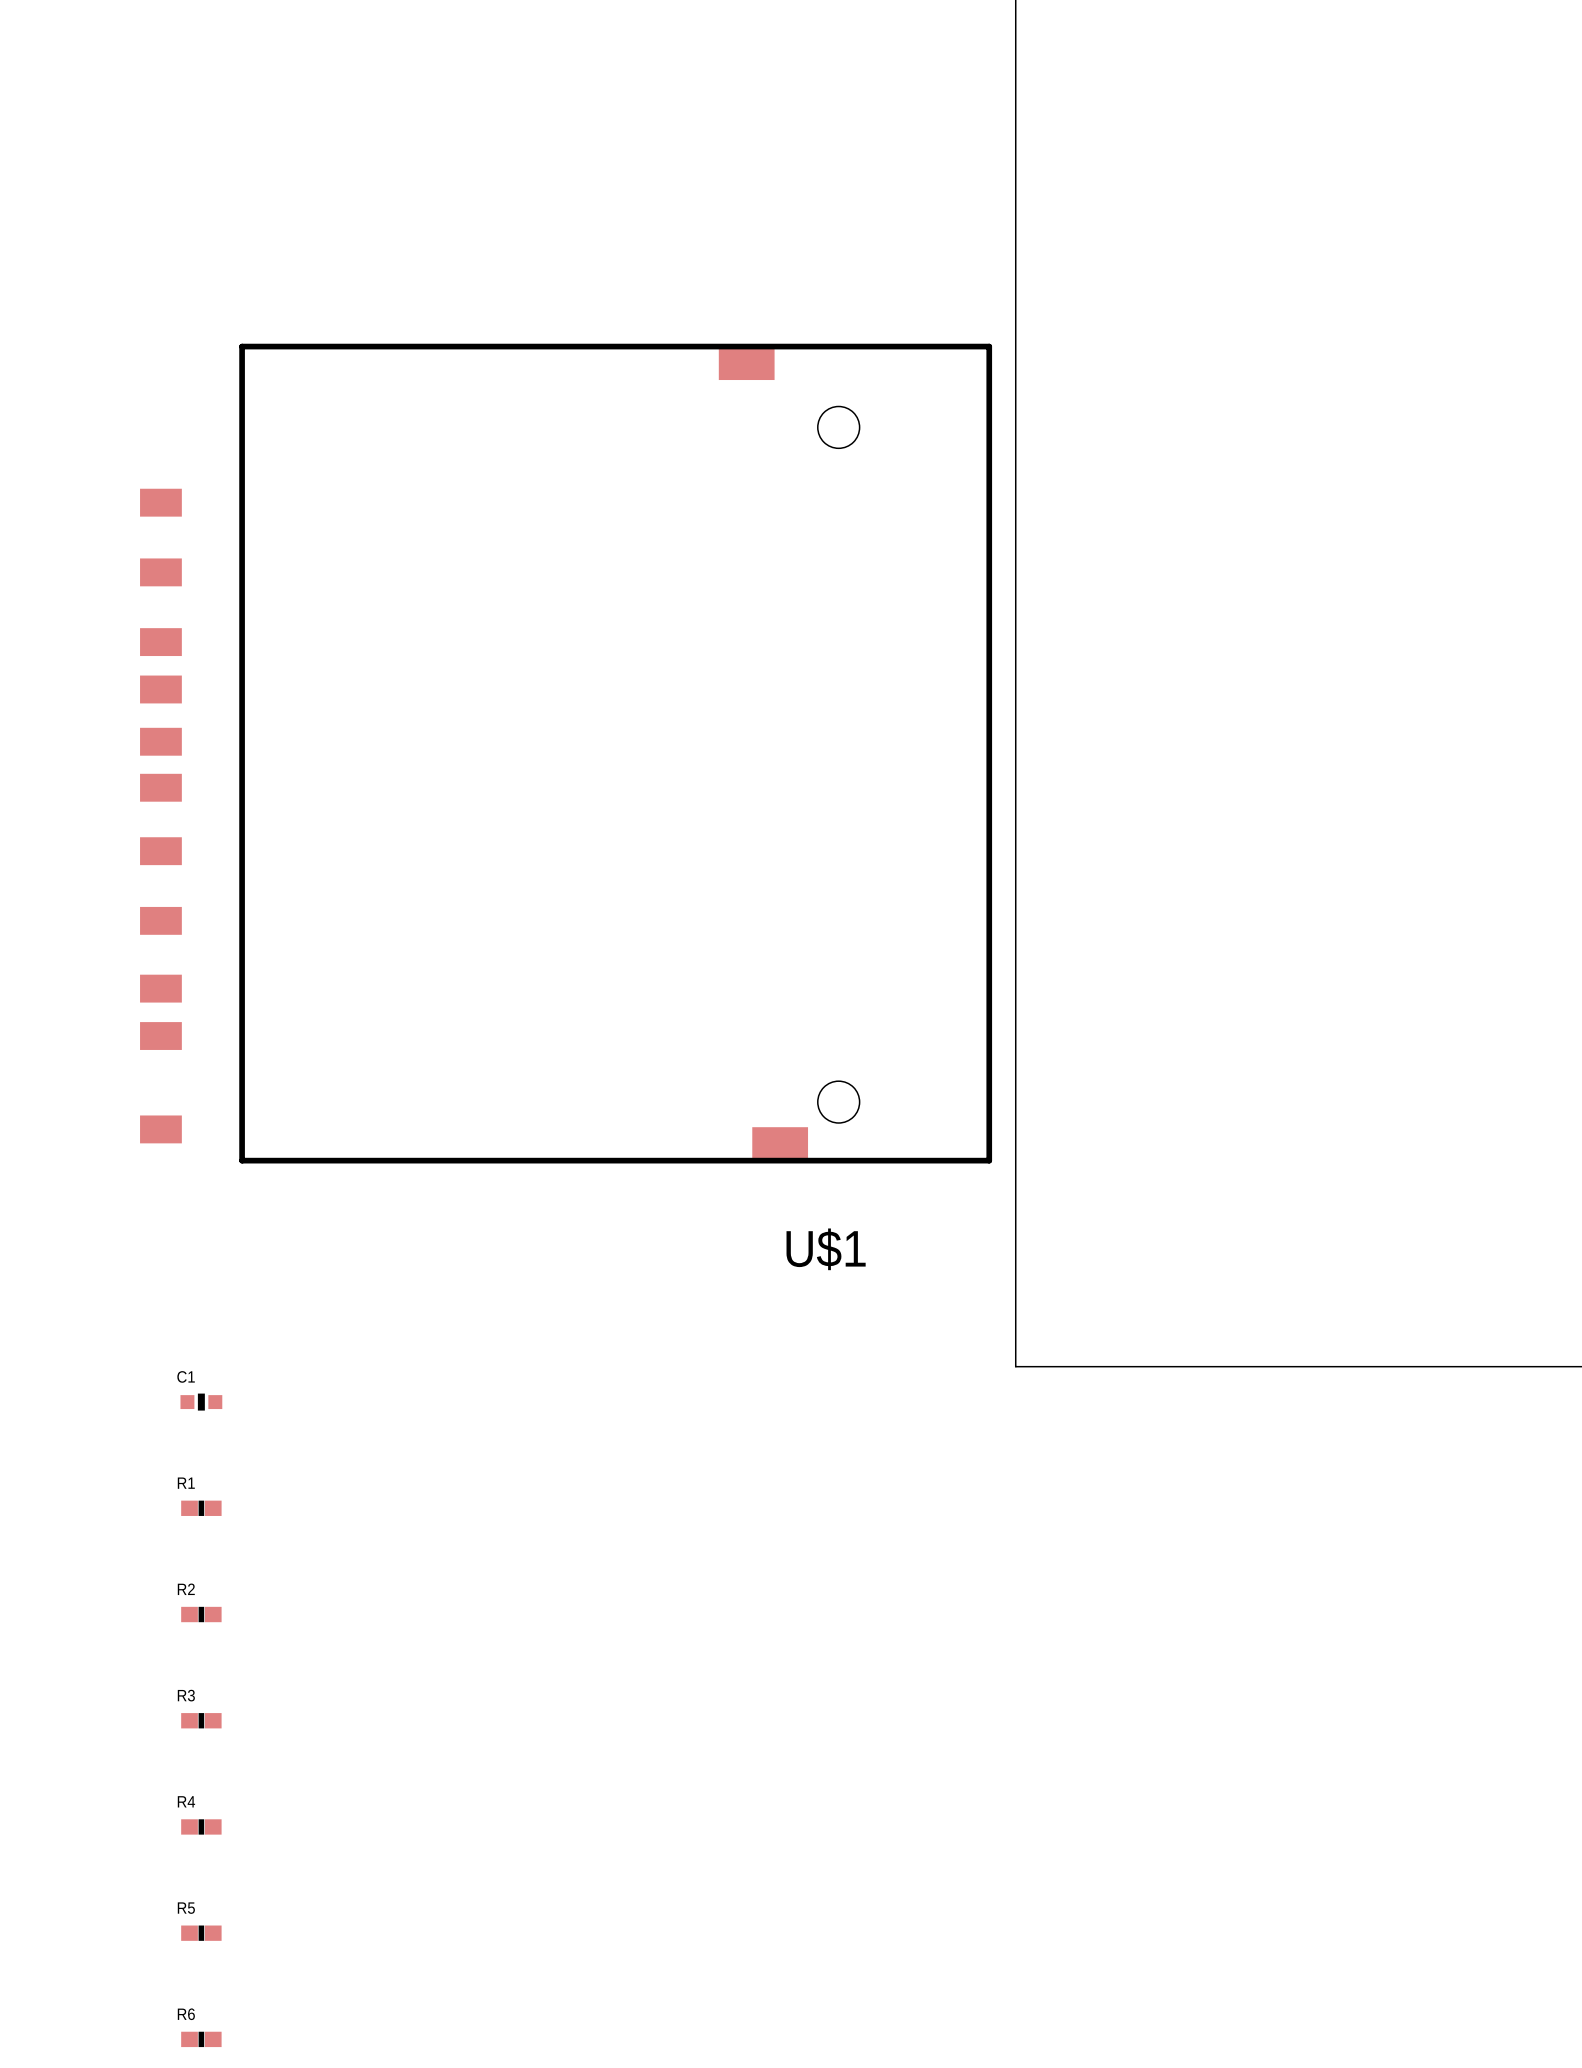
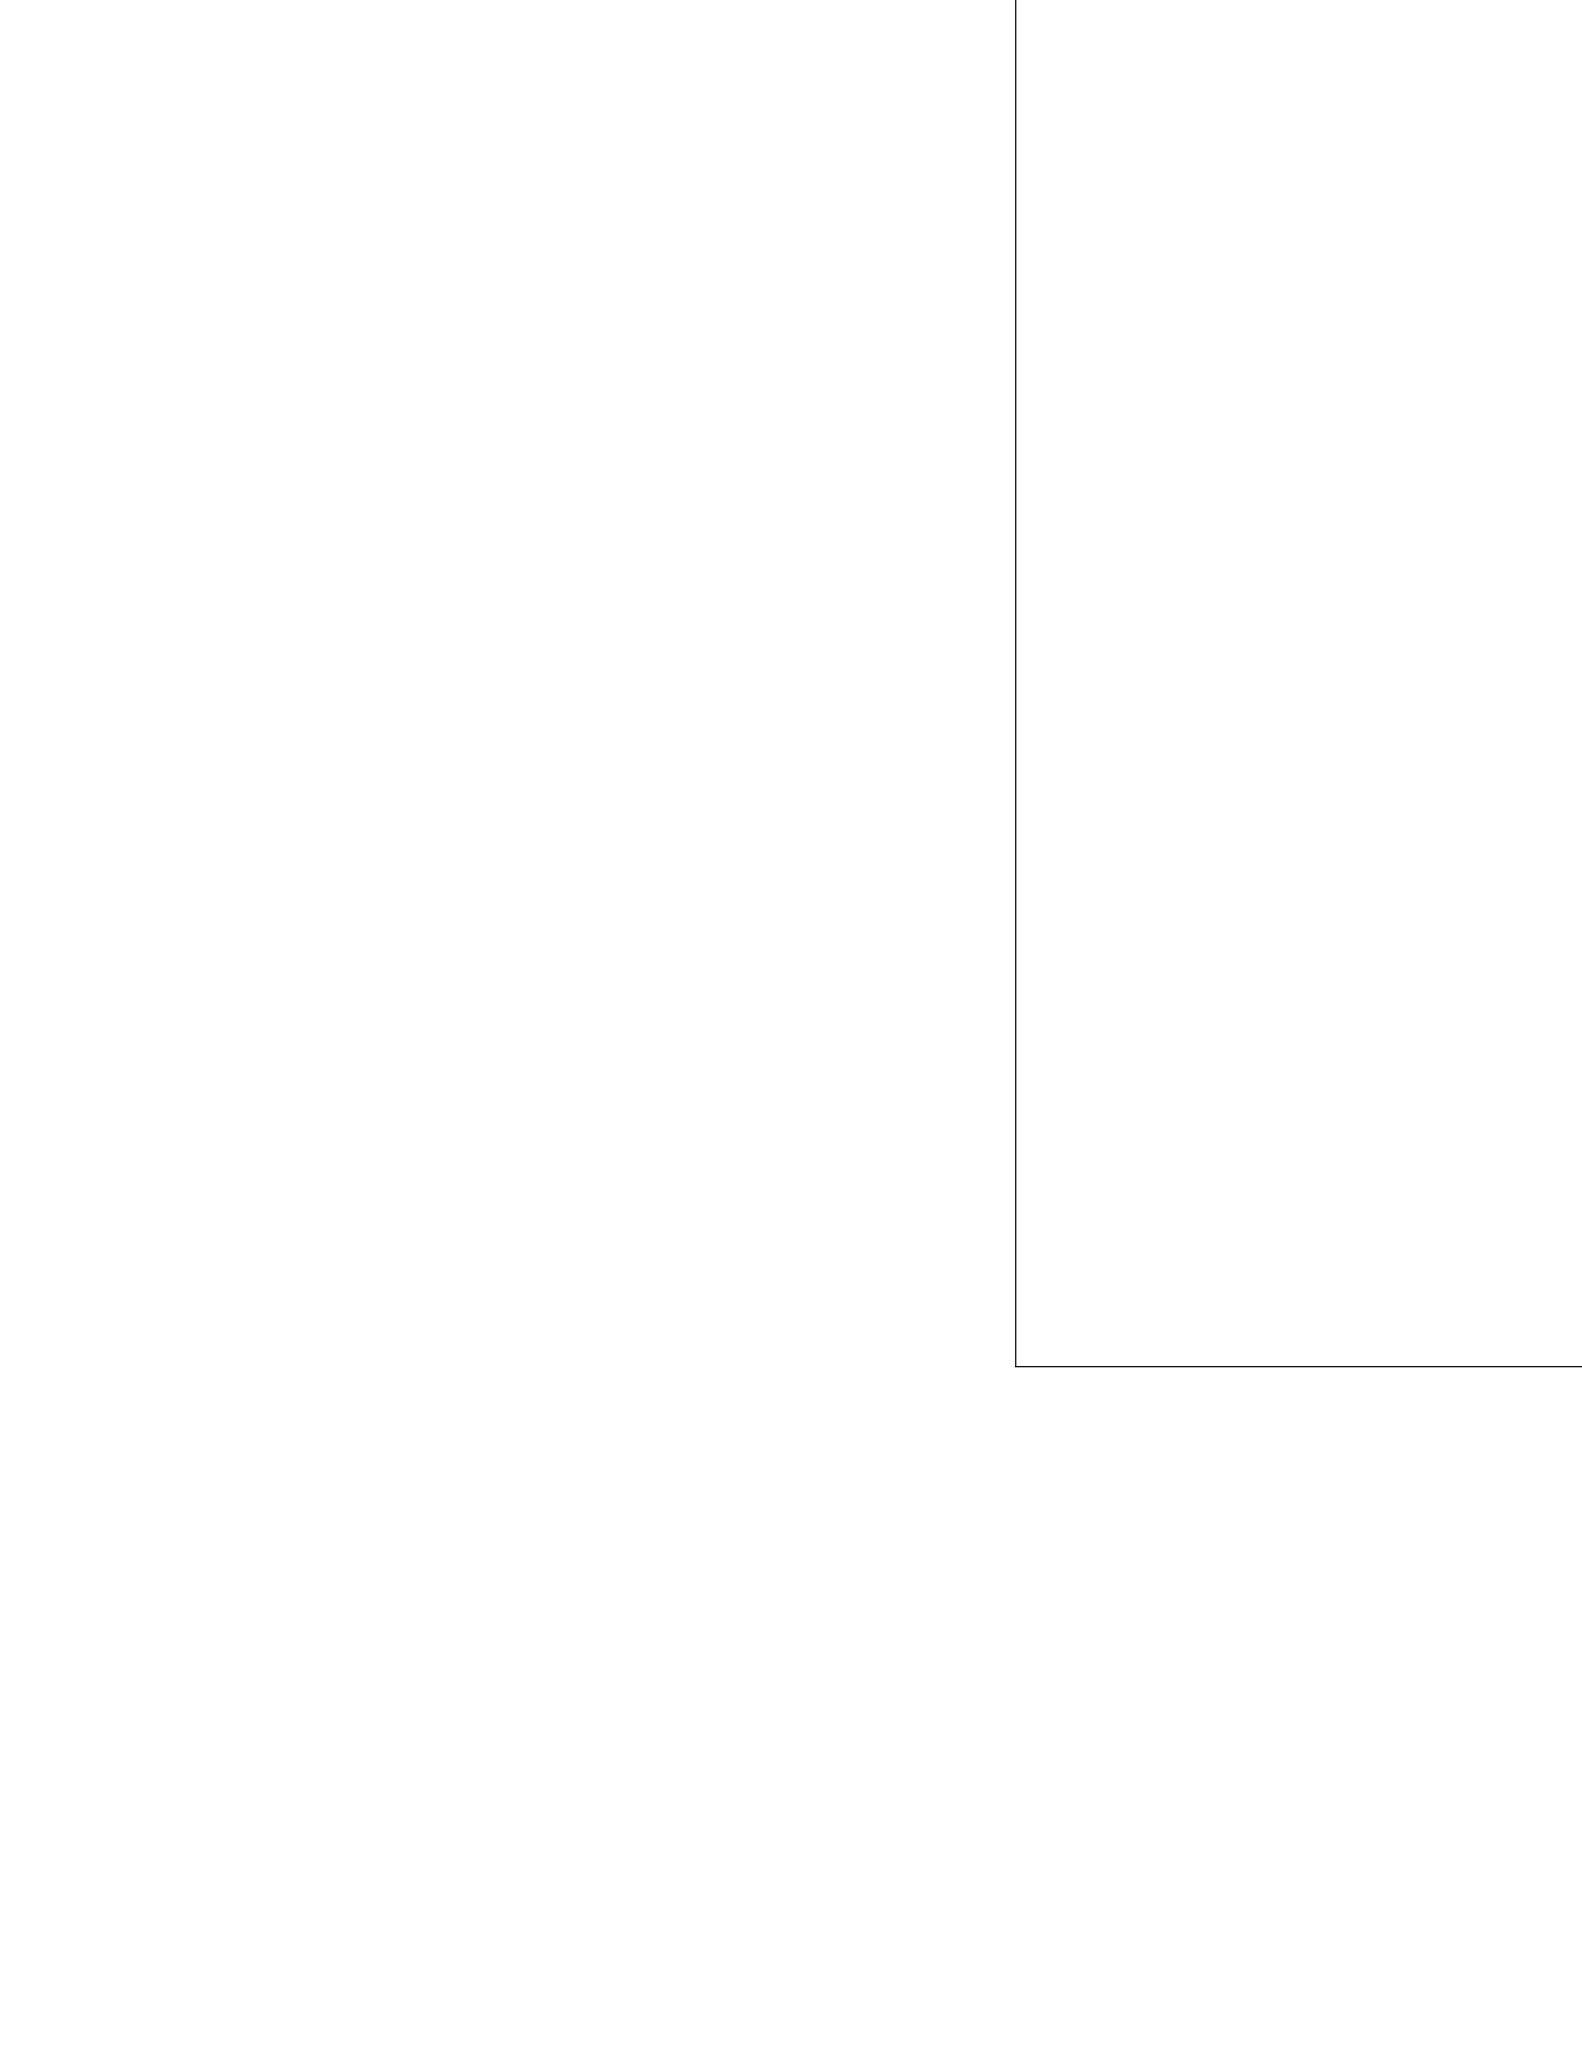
U$1: (566, 753) -> none
C1: (201, 1402) -> none
R1: (201, 1508) -> none
R2: (201, 1614) -> none
R3: (201, 1720) -> none
R4: (201, 1826) -> none
R5: (201, 1933) -> none
R6: (201, 2039) -> none

